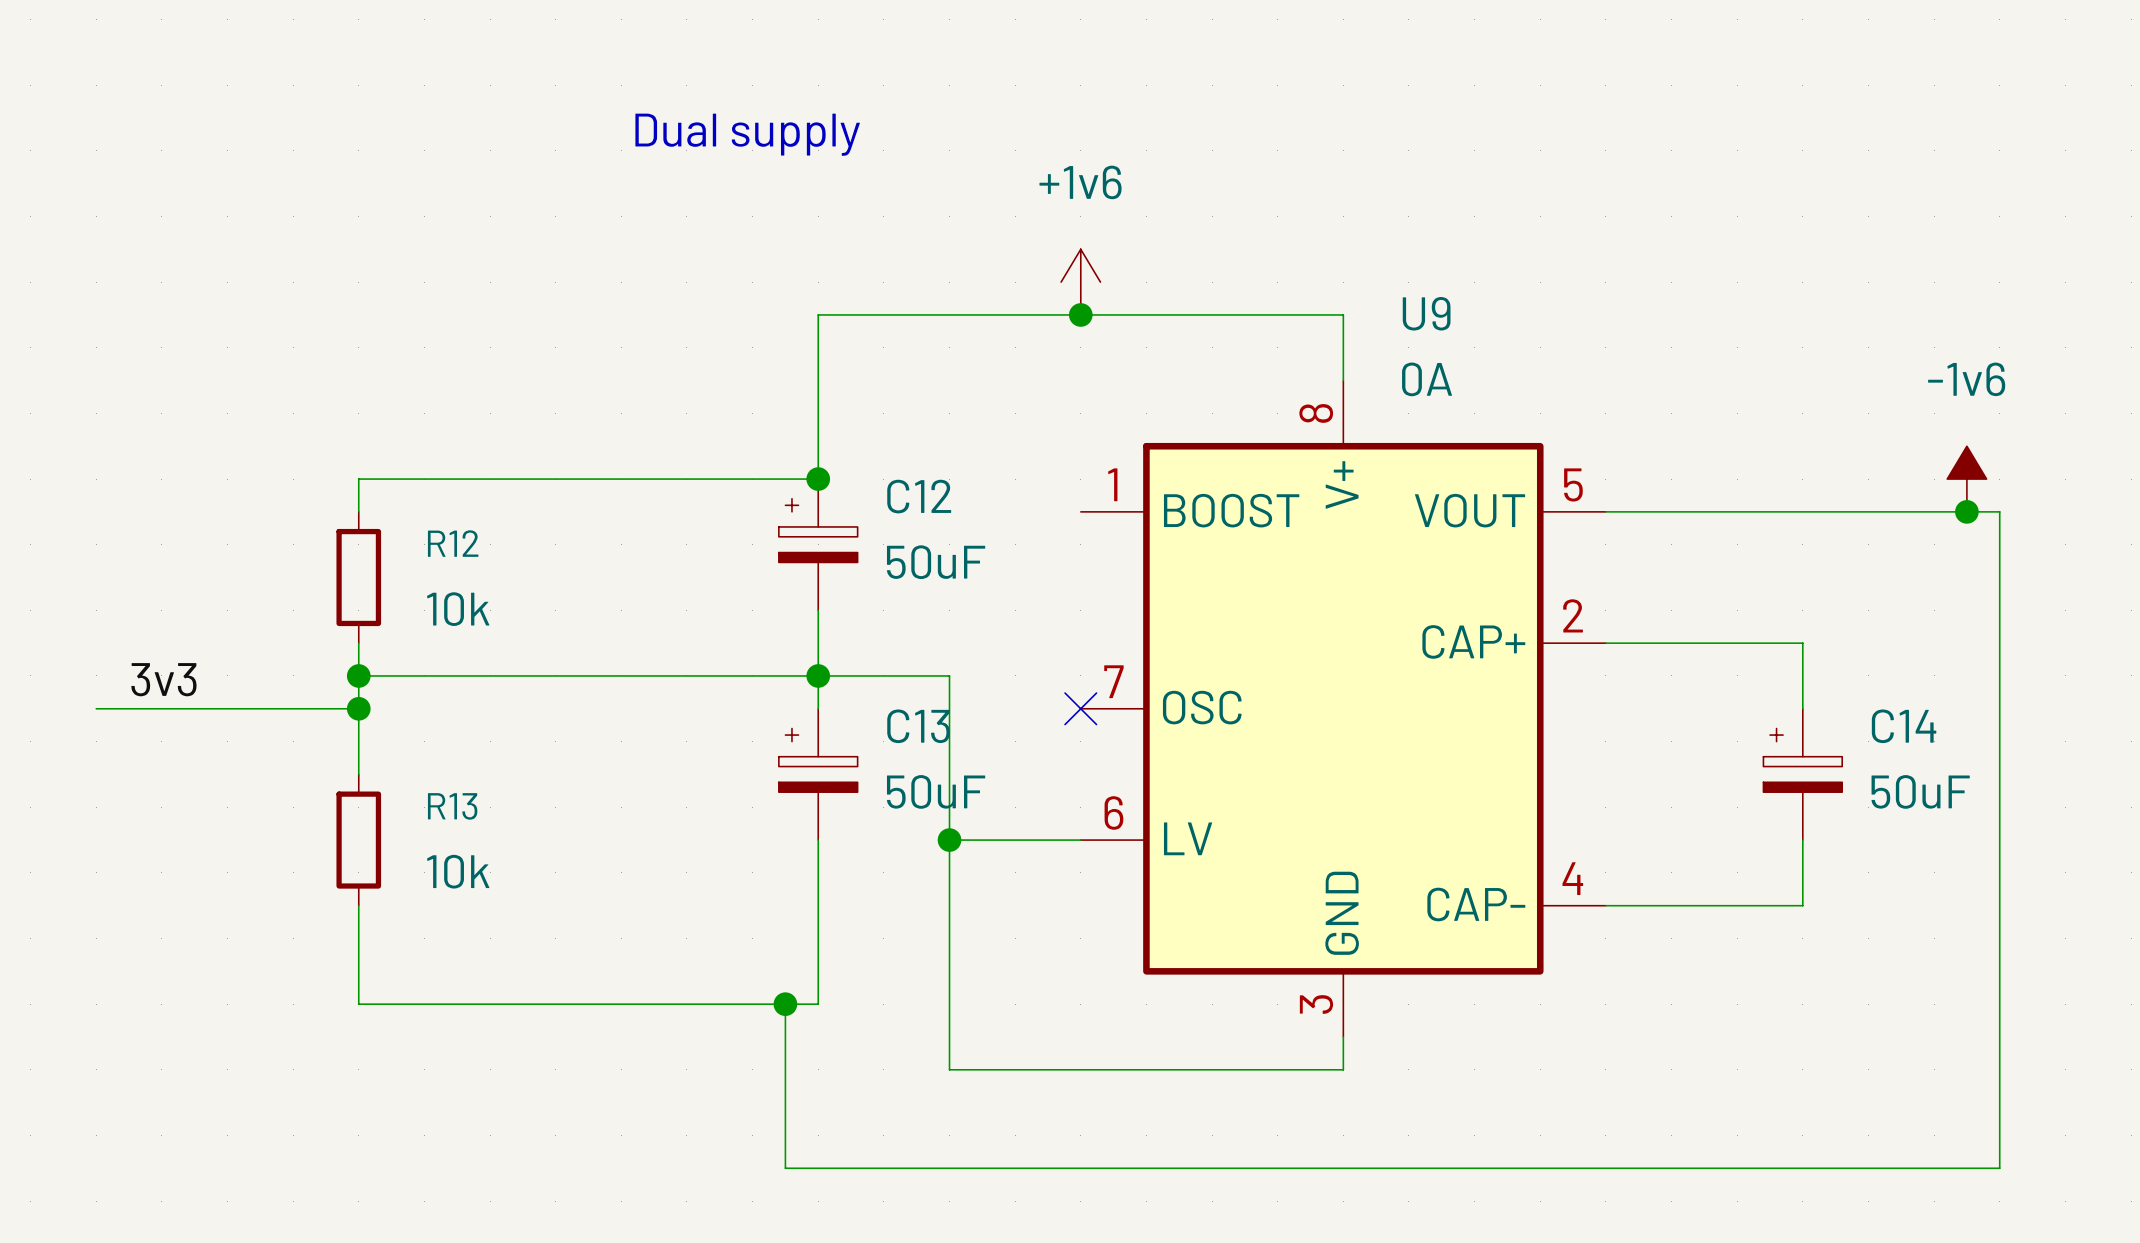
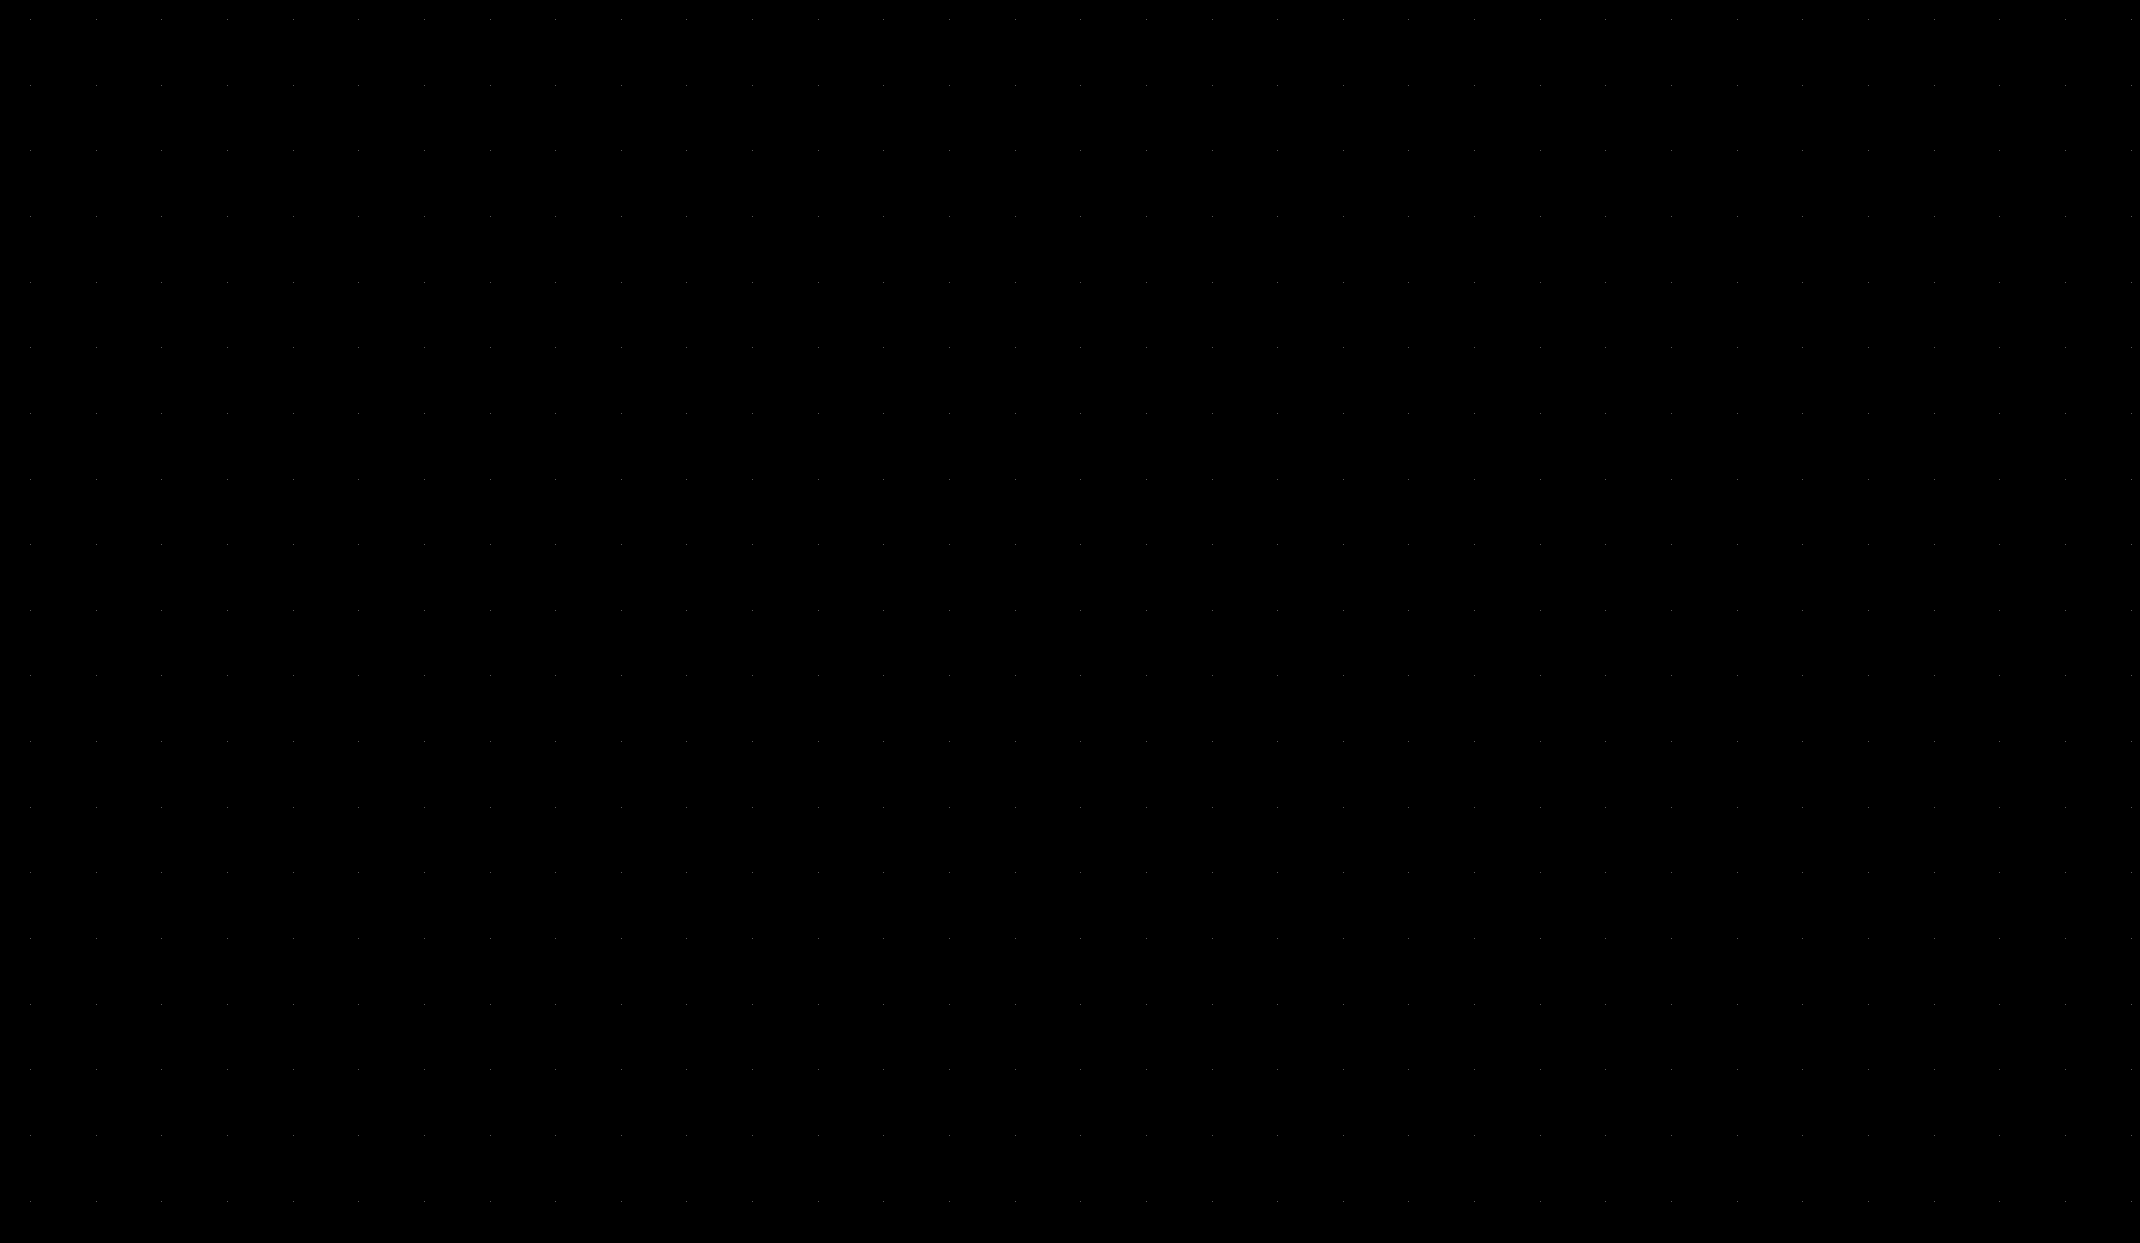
text: Dual supply (747, 134) -> none
power symbol: +1v6 (1080, 282) -> none
junction: (1080, 314) -> none
wire: (1343, 380) (1343, 314) (818, 314) (818, 479) (358, 479) (358, 511) -> none
junction: (818, 479) -> none
power symbol: -1v6 (1966, 479) -> none
wire: (1605, 511) (1999, 511) (1999, 1168) (785, 1168) (785, 1004) -> none
junction: (1966, 511) -> none
C12: 50uF (818, 544) -> none
R12: 10k (358, 577) -> none
wire: (818, 610) (818, 708) -> none
wire: (358, 643) (358, 774) -> none
wire: (1605, 643) (1802, 643) (1802, 708) -> none
wire: (358, 675) (949, 675) (949, 1069) (1343, 1069) (1343, 1036) -> none
junction: (358, 675) -> none
junction: (818, 675) -> none
label: 3v3 (163, 679) -> none
wire: (96, 708) (358, 708) -> none
junction: (358, 708) -> none
no-connect mark: (1080, 708) -> none
U9: 0A (1343, 708) -> none
C13: 50uF (818, 774) -> none
C14: 50uF (1802, 774) -> none
R13: 10k (358, 840) -> none
wire: (818, 840) (818, 1004) (358, 1004) (358, 905) -> none
wire: (949, 840) (1080, 840) -> none
junction: (949, 840) -> none
wire: (1802, 840) (1802, 905) (1605, 905) -> none
junction: (785, 1004) -> none

